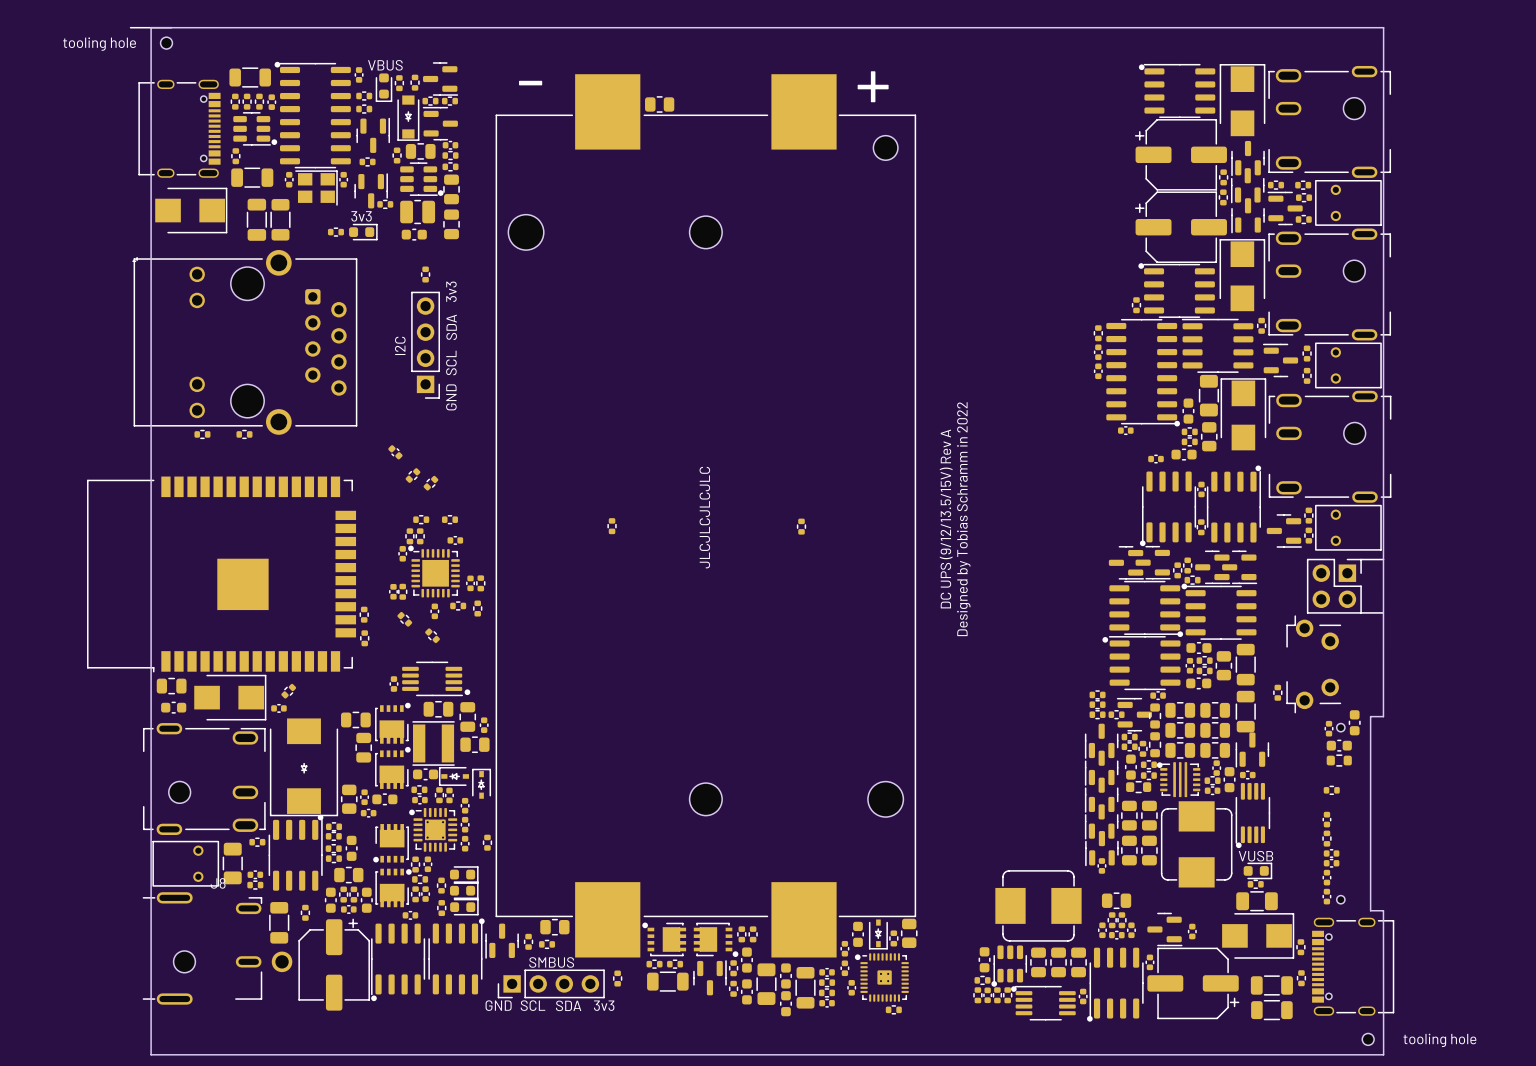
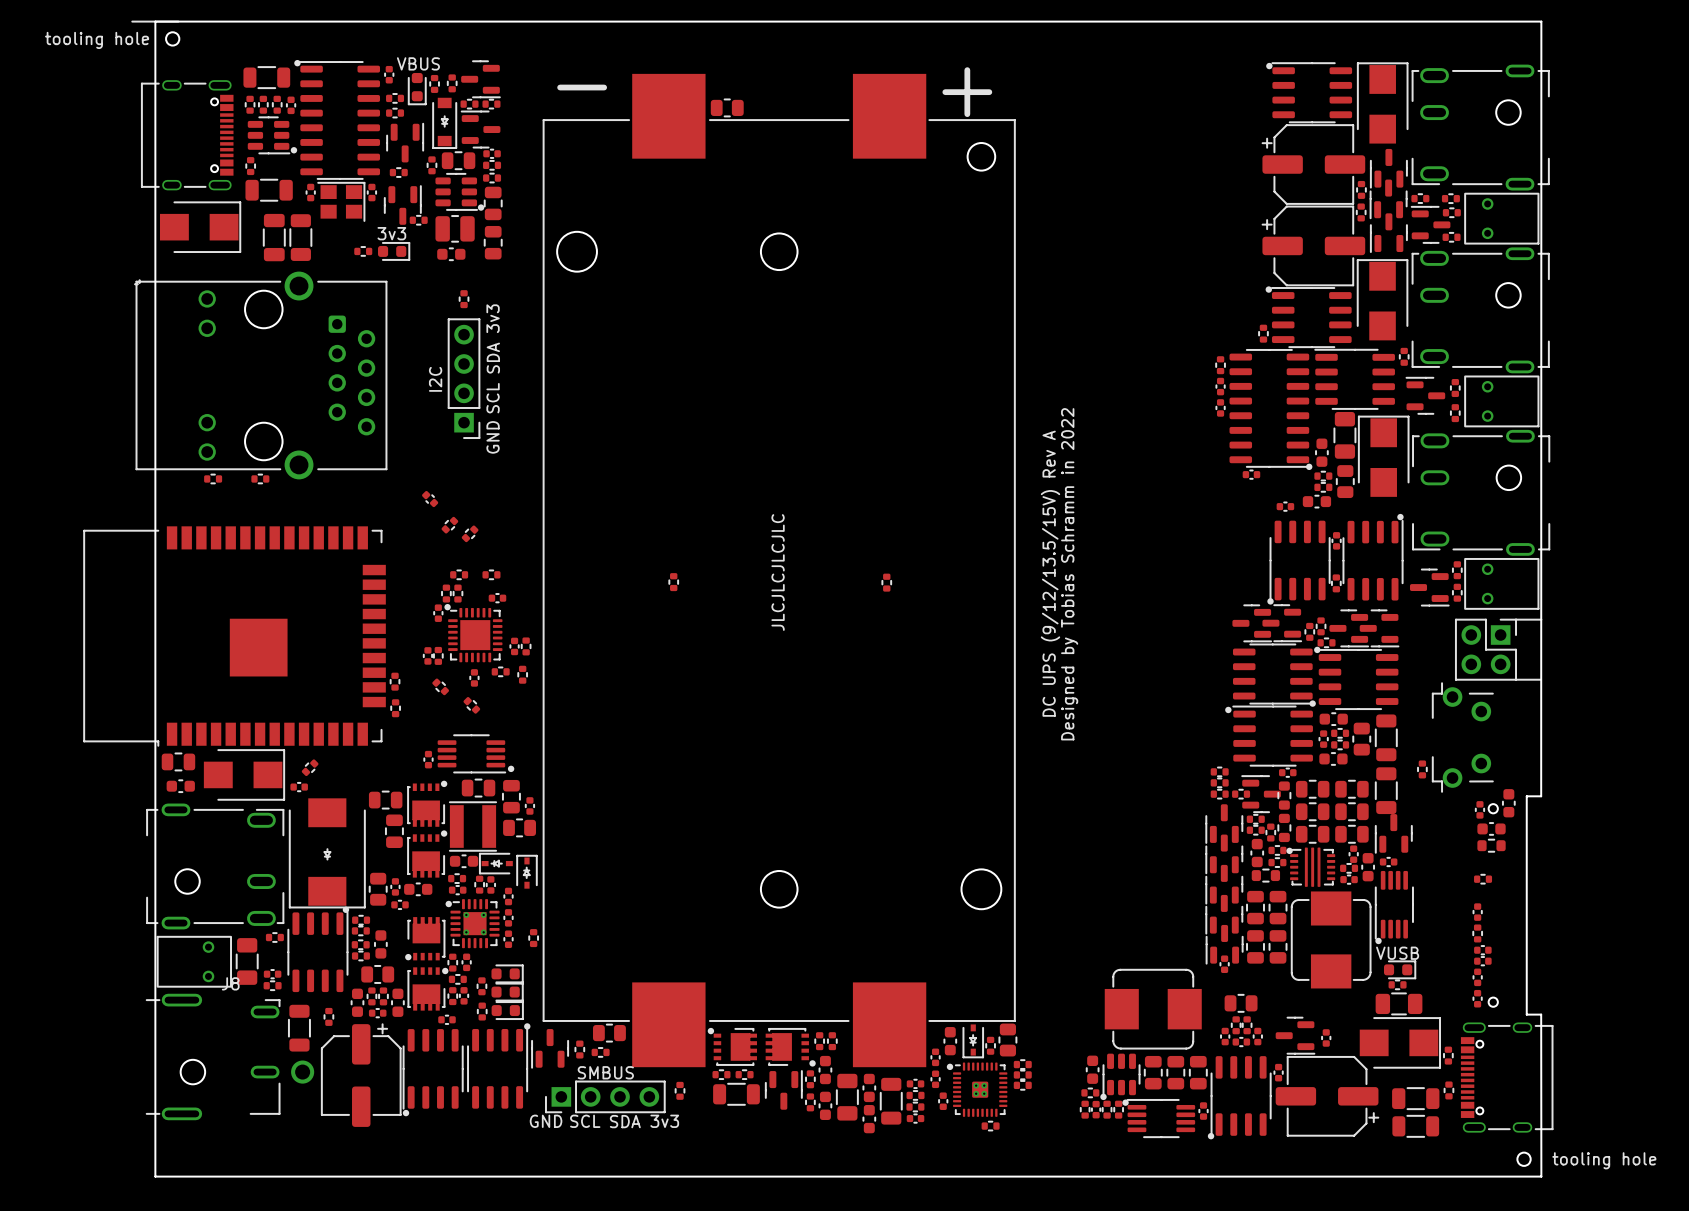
part: none -> (1022, 1064)
part: none -> (1022, 1074)
part: none -> (1022, 1085)

